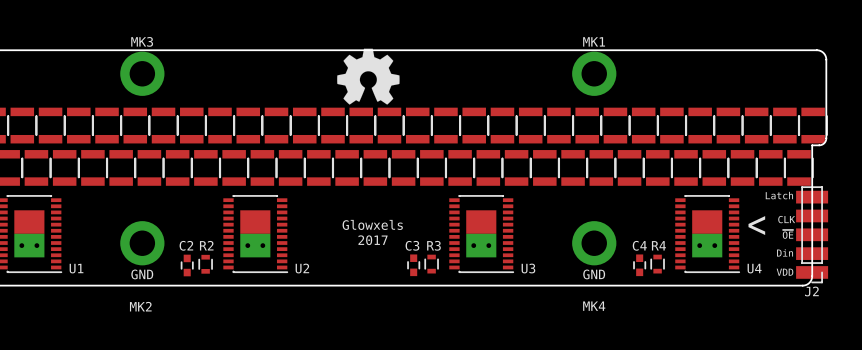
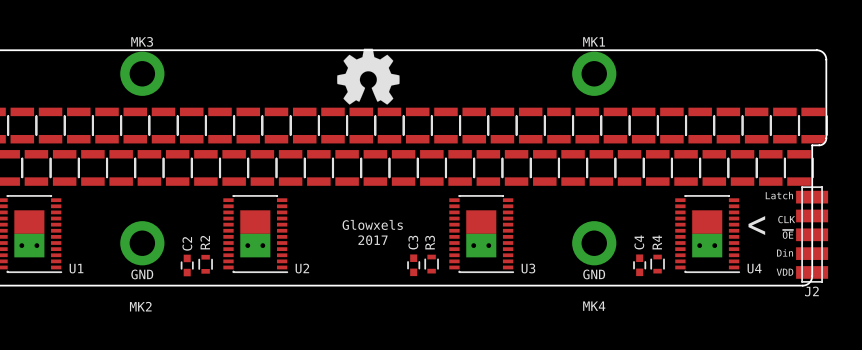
J2 footprint: [796, 186, 829, 283] -> [796, 186, 829, 283]
C2 name rotation: 0° (186, 245) -> 90° counterclockwise (187, 243)
R2 name rotation: 0° (206, 245) -> 90° counterclockwise (205, 242)
C3 name rotation: 0° (412, 245) -> 90° counterclockwise (413, 242)
R3 name rotation: 0° (433, 245) -> 90° counterclockwise (430, 242)
C4 name rotation: 0° (639, 245) -> 90° counterclockwise (639, 242)
R4 name rotation: 0° (658, 245) -> 90° counterclockwise (657, 242)

